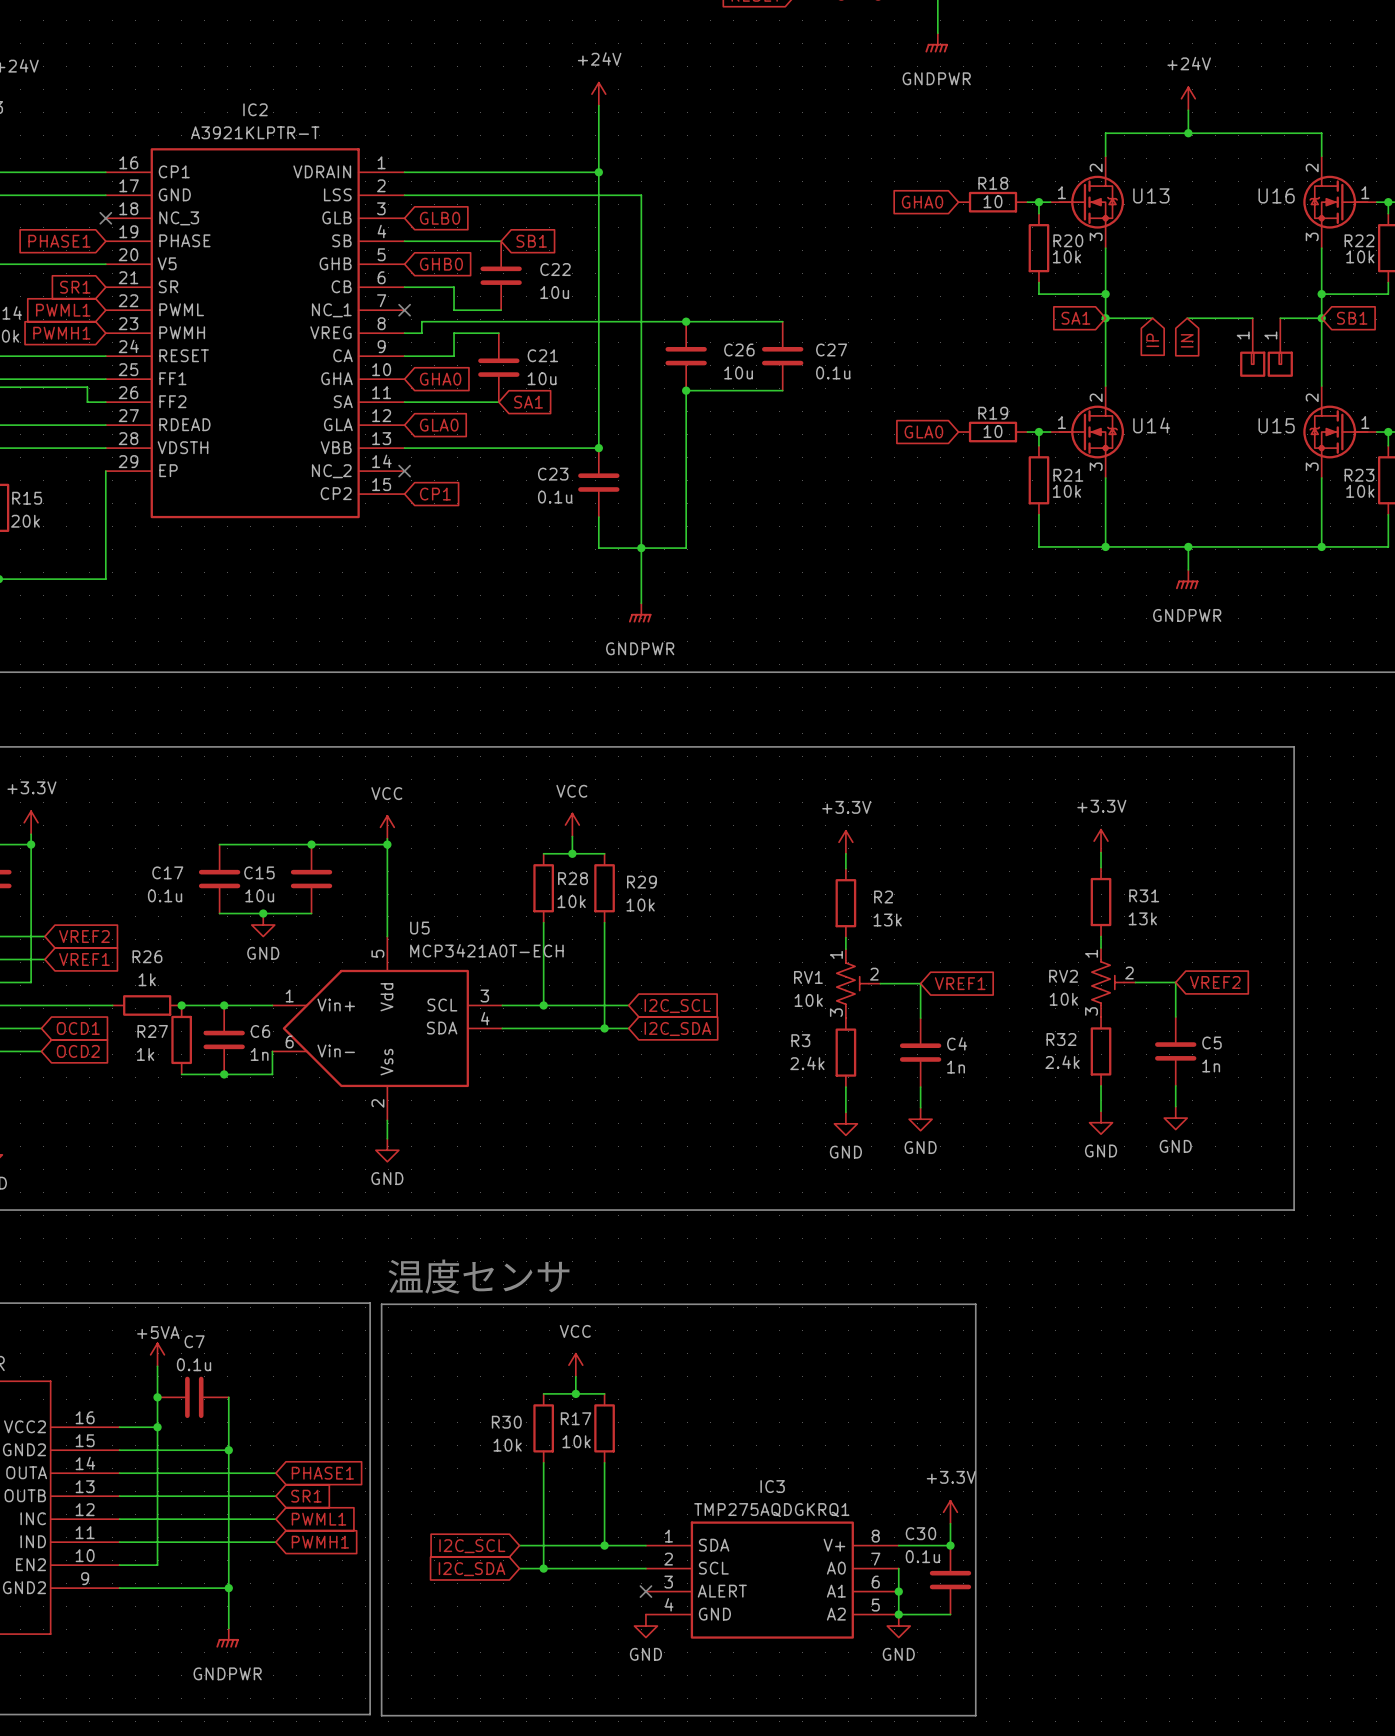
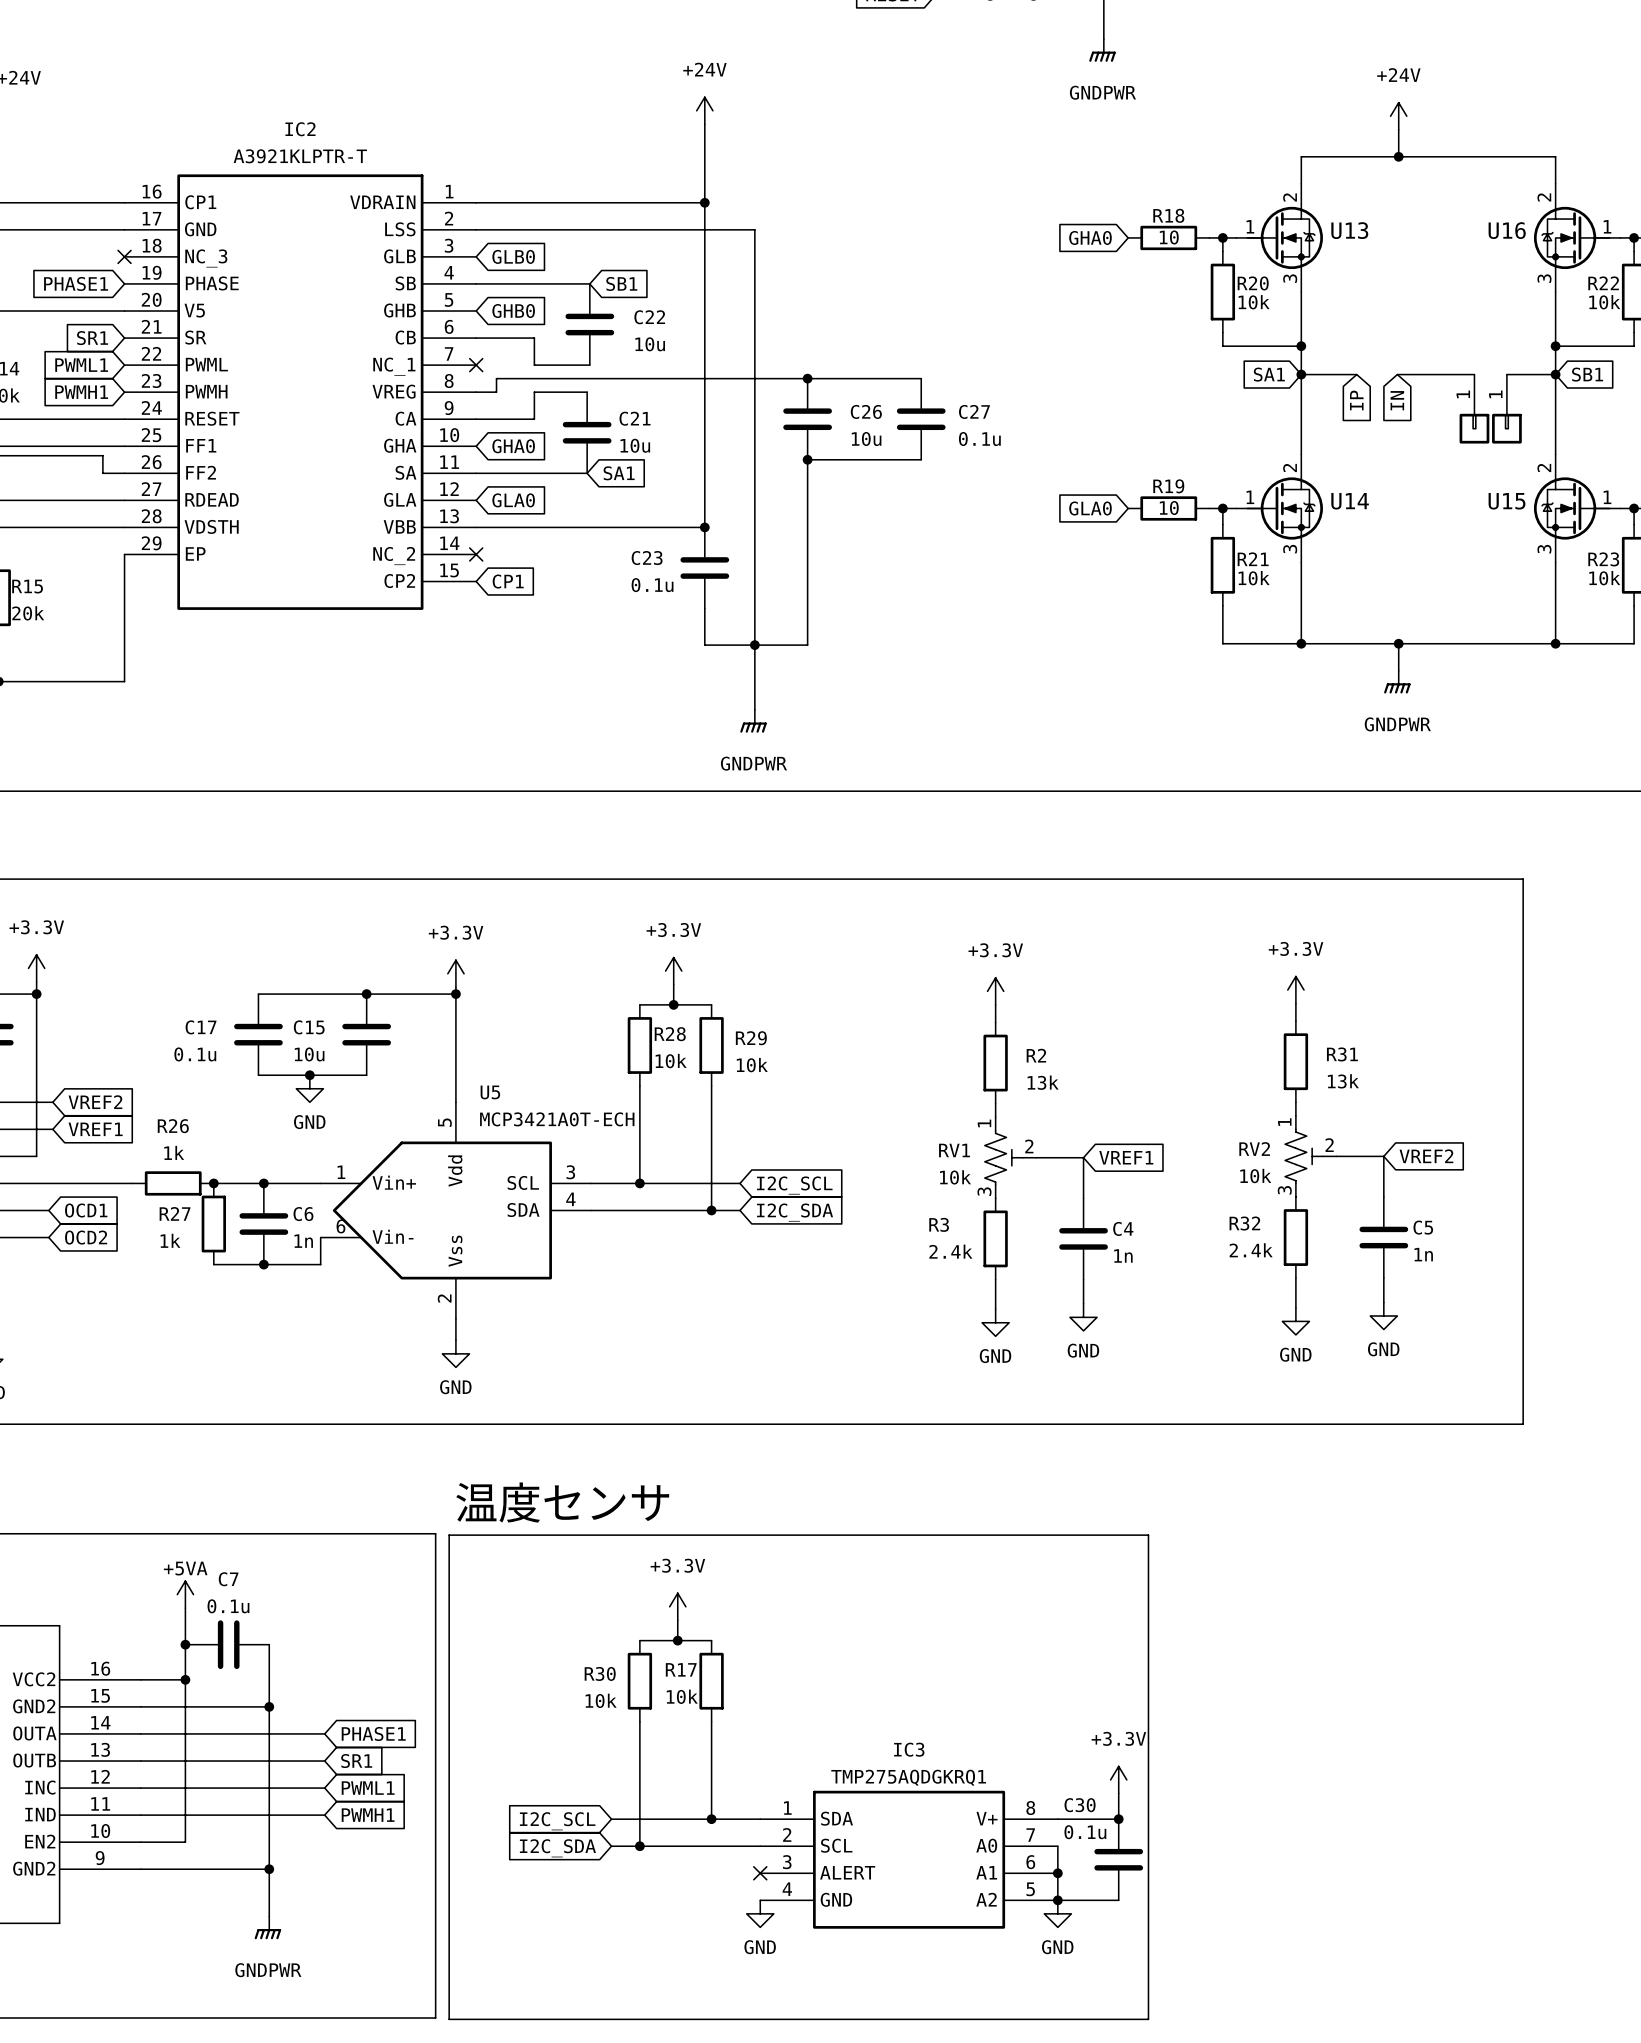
power symbol: VCC (572, 825) -> +3.3V (673, 971)
power symbol: VCC (387, 827) -> +3.3V (455, 973)
power symbol: VCC (575, 1365) -> +3.3V (677, 1606)

